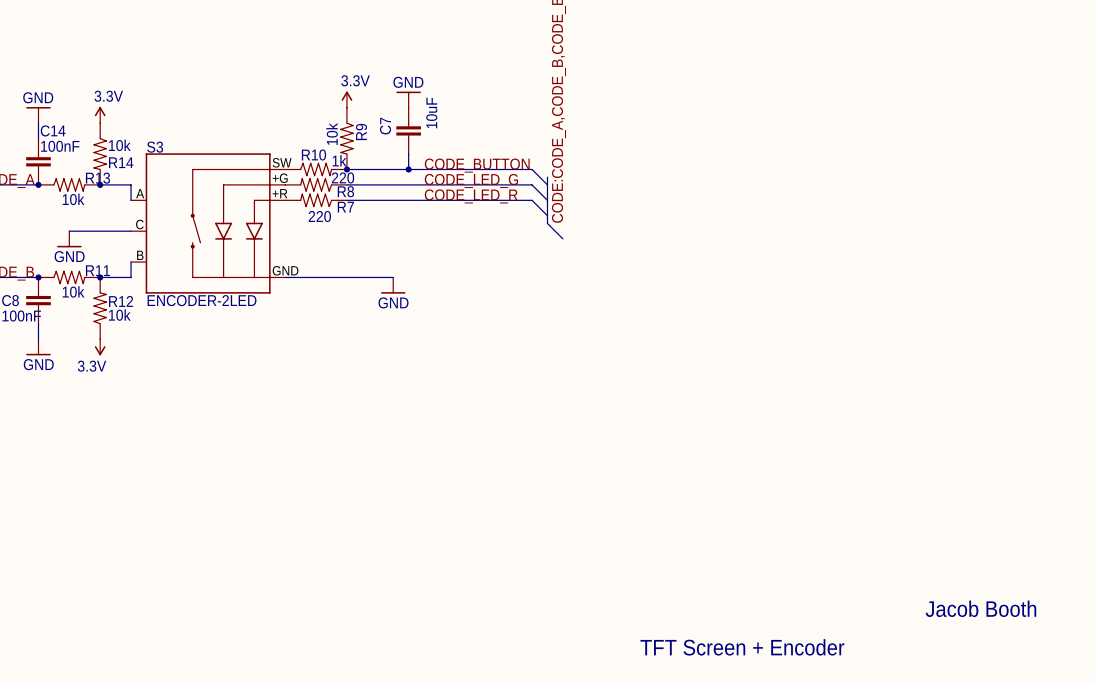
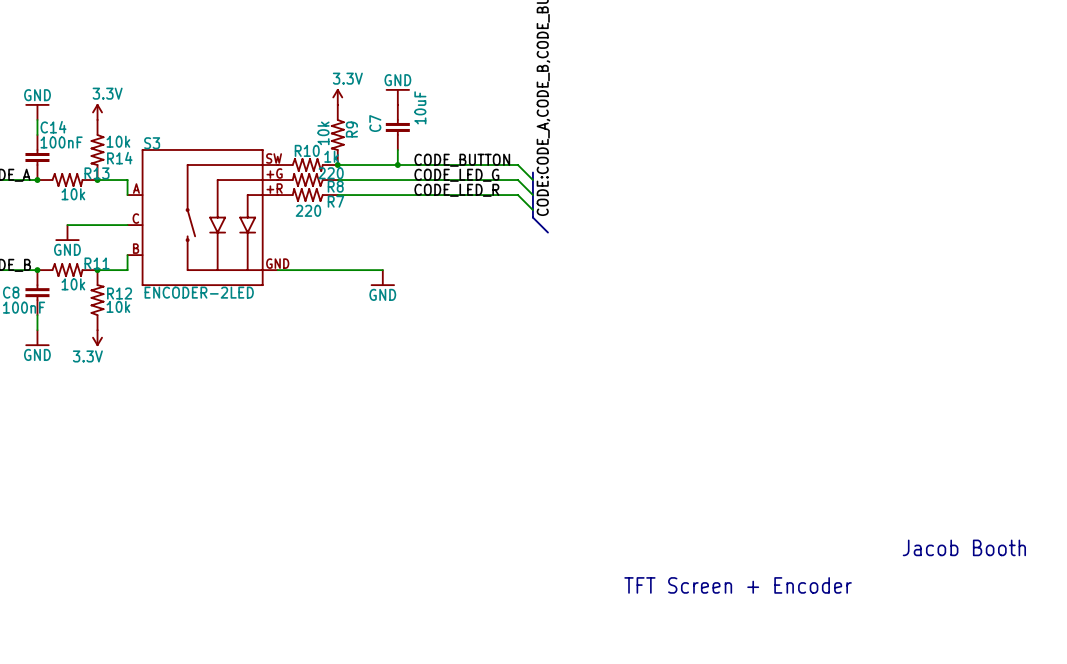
text position: Jacob Booth (980, 608) -> Jacob Booth (964, 547)
text position: TFT Screen + Encoder (742, 647) -> TFT Screen + Encoder (738, 585)

